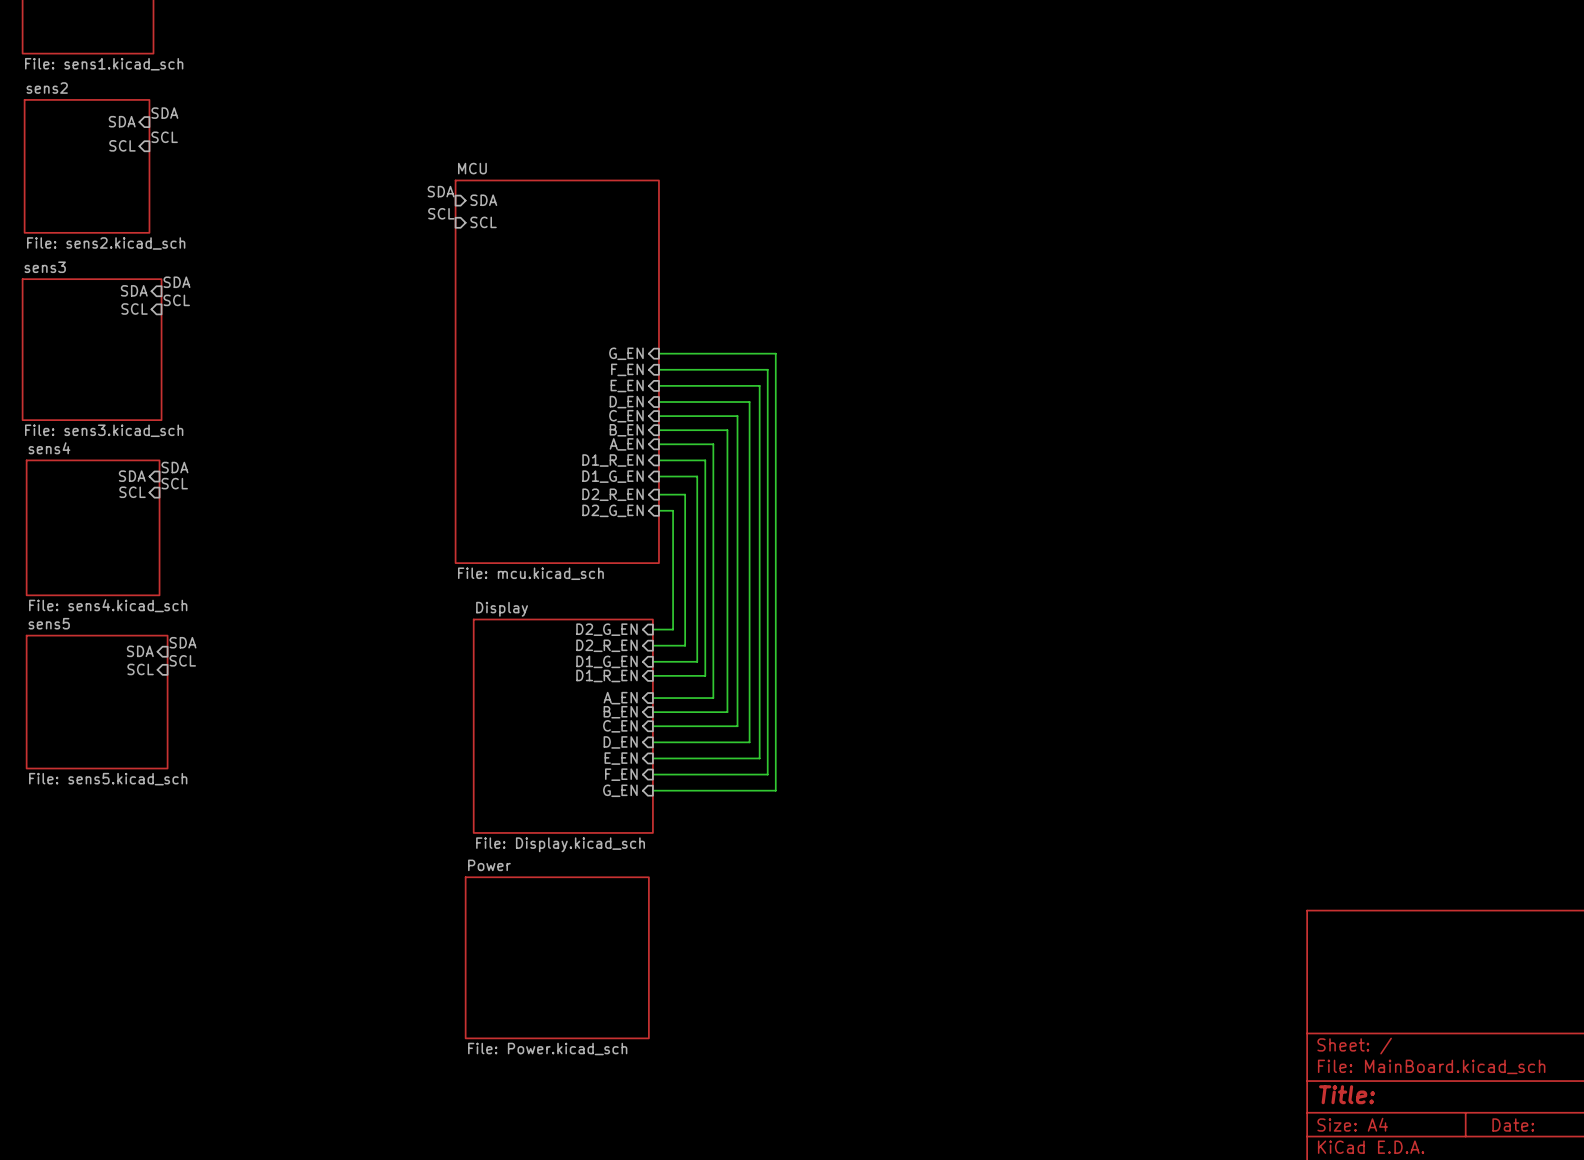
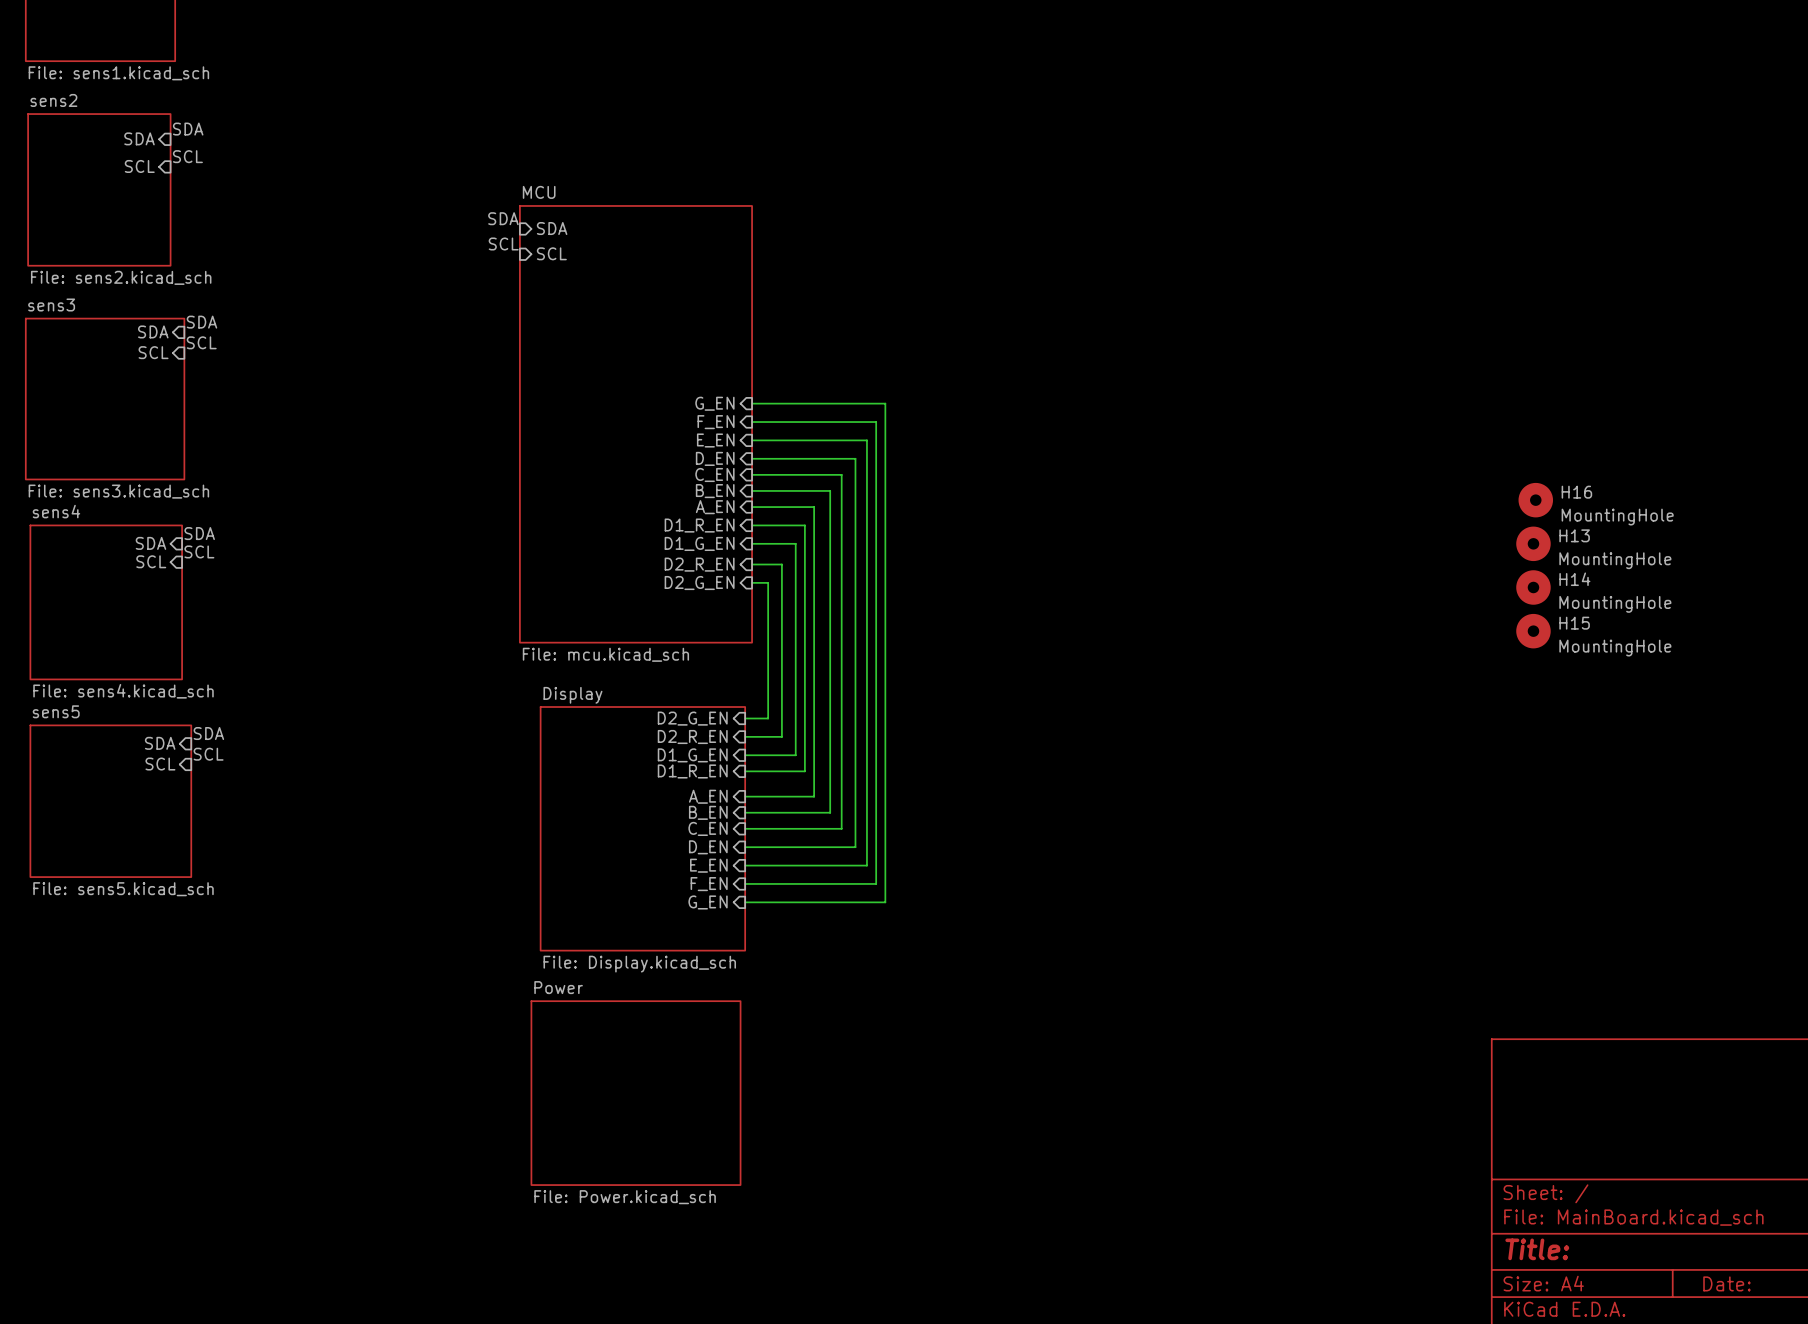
H16: none -> MountingHole (1535, 500)
H13: none -> MountingHole (1533, 543)
H14: none -> MountingHole (1533, 587)
H15: none -> MountingHole (1533, 631)

